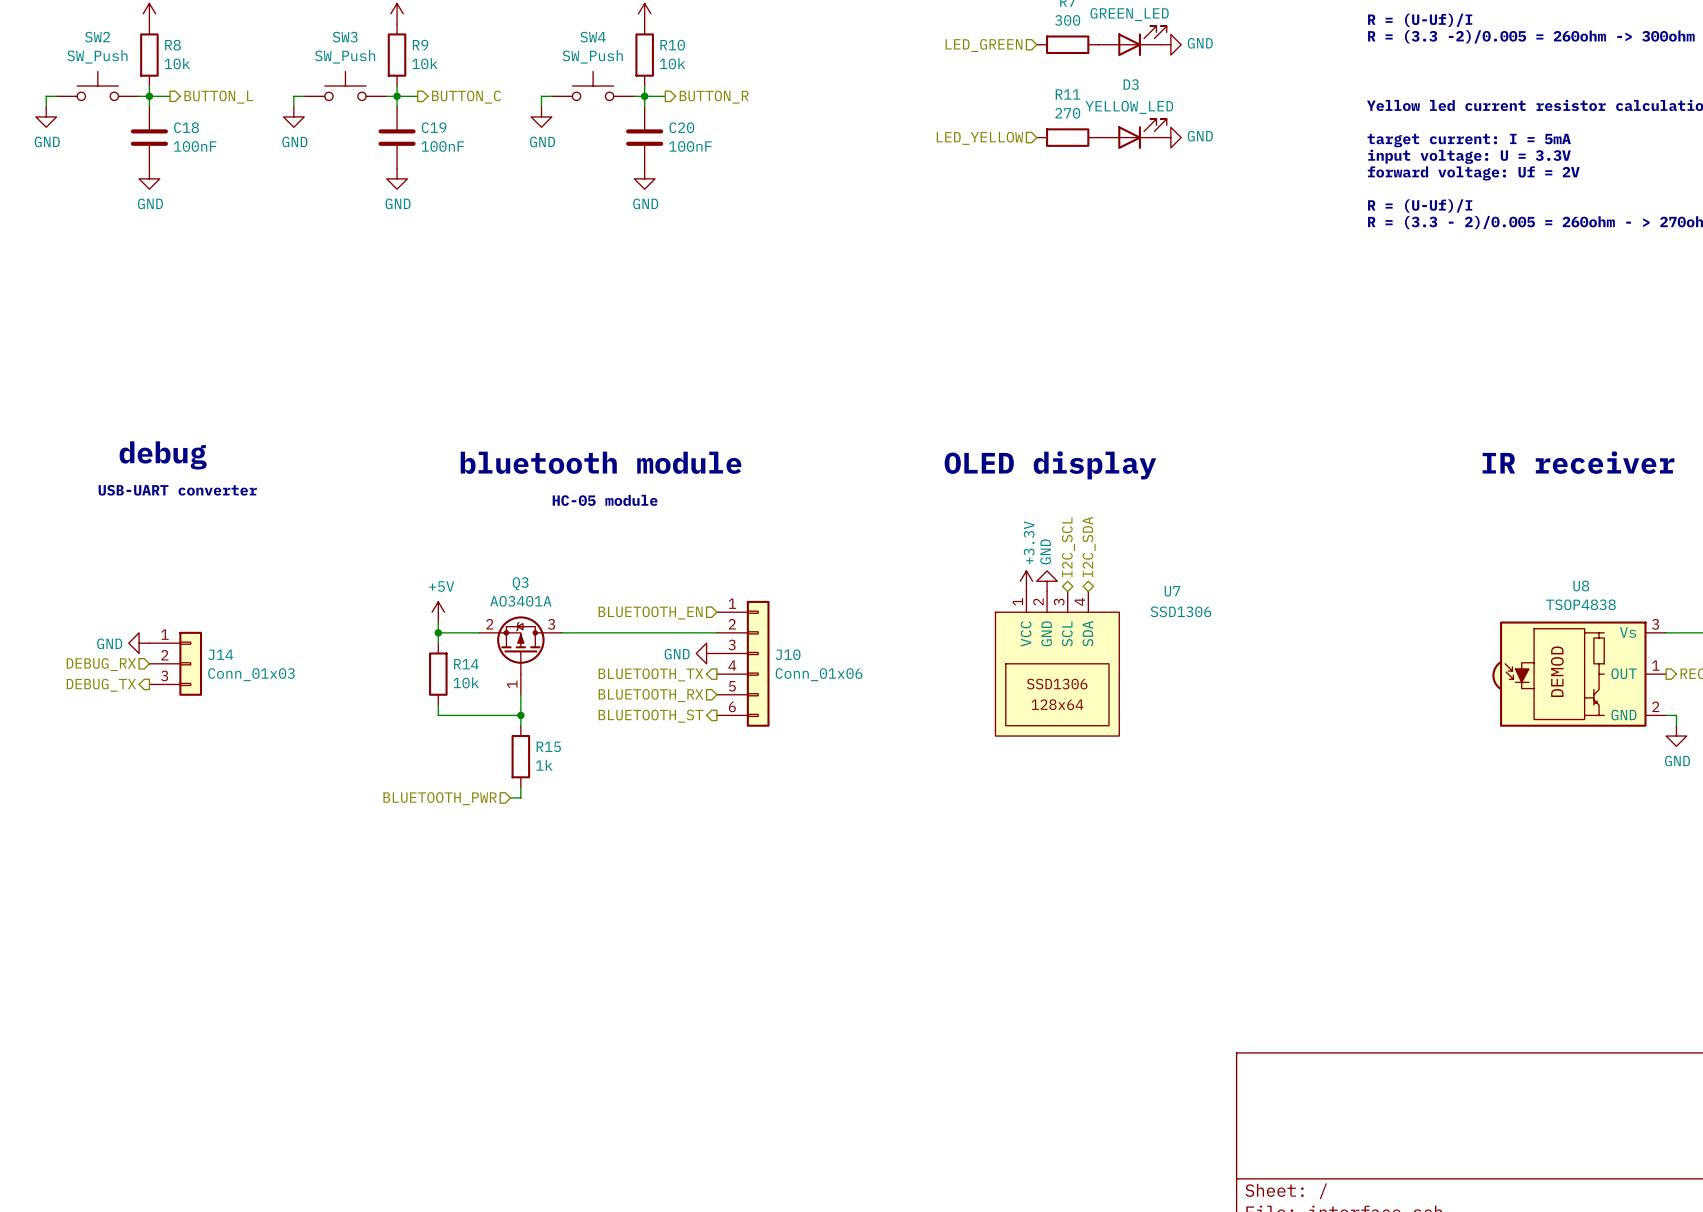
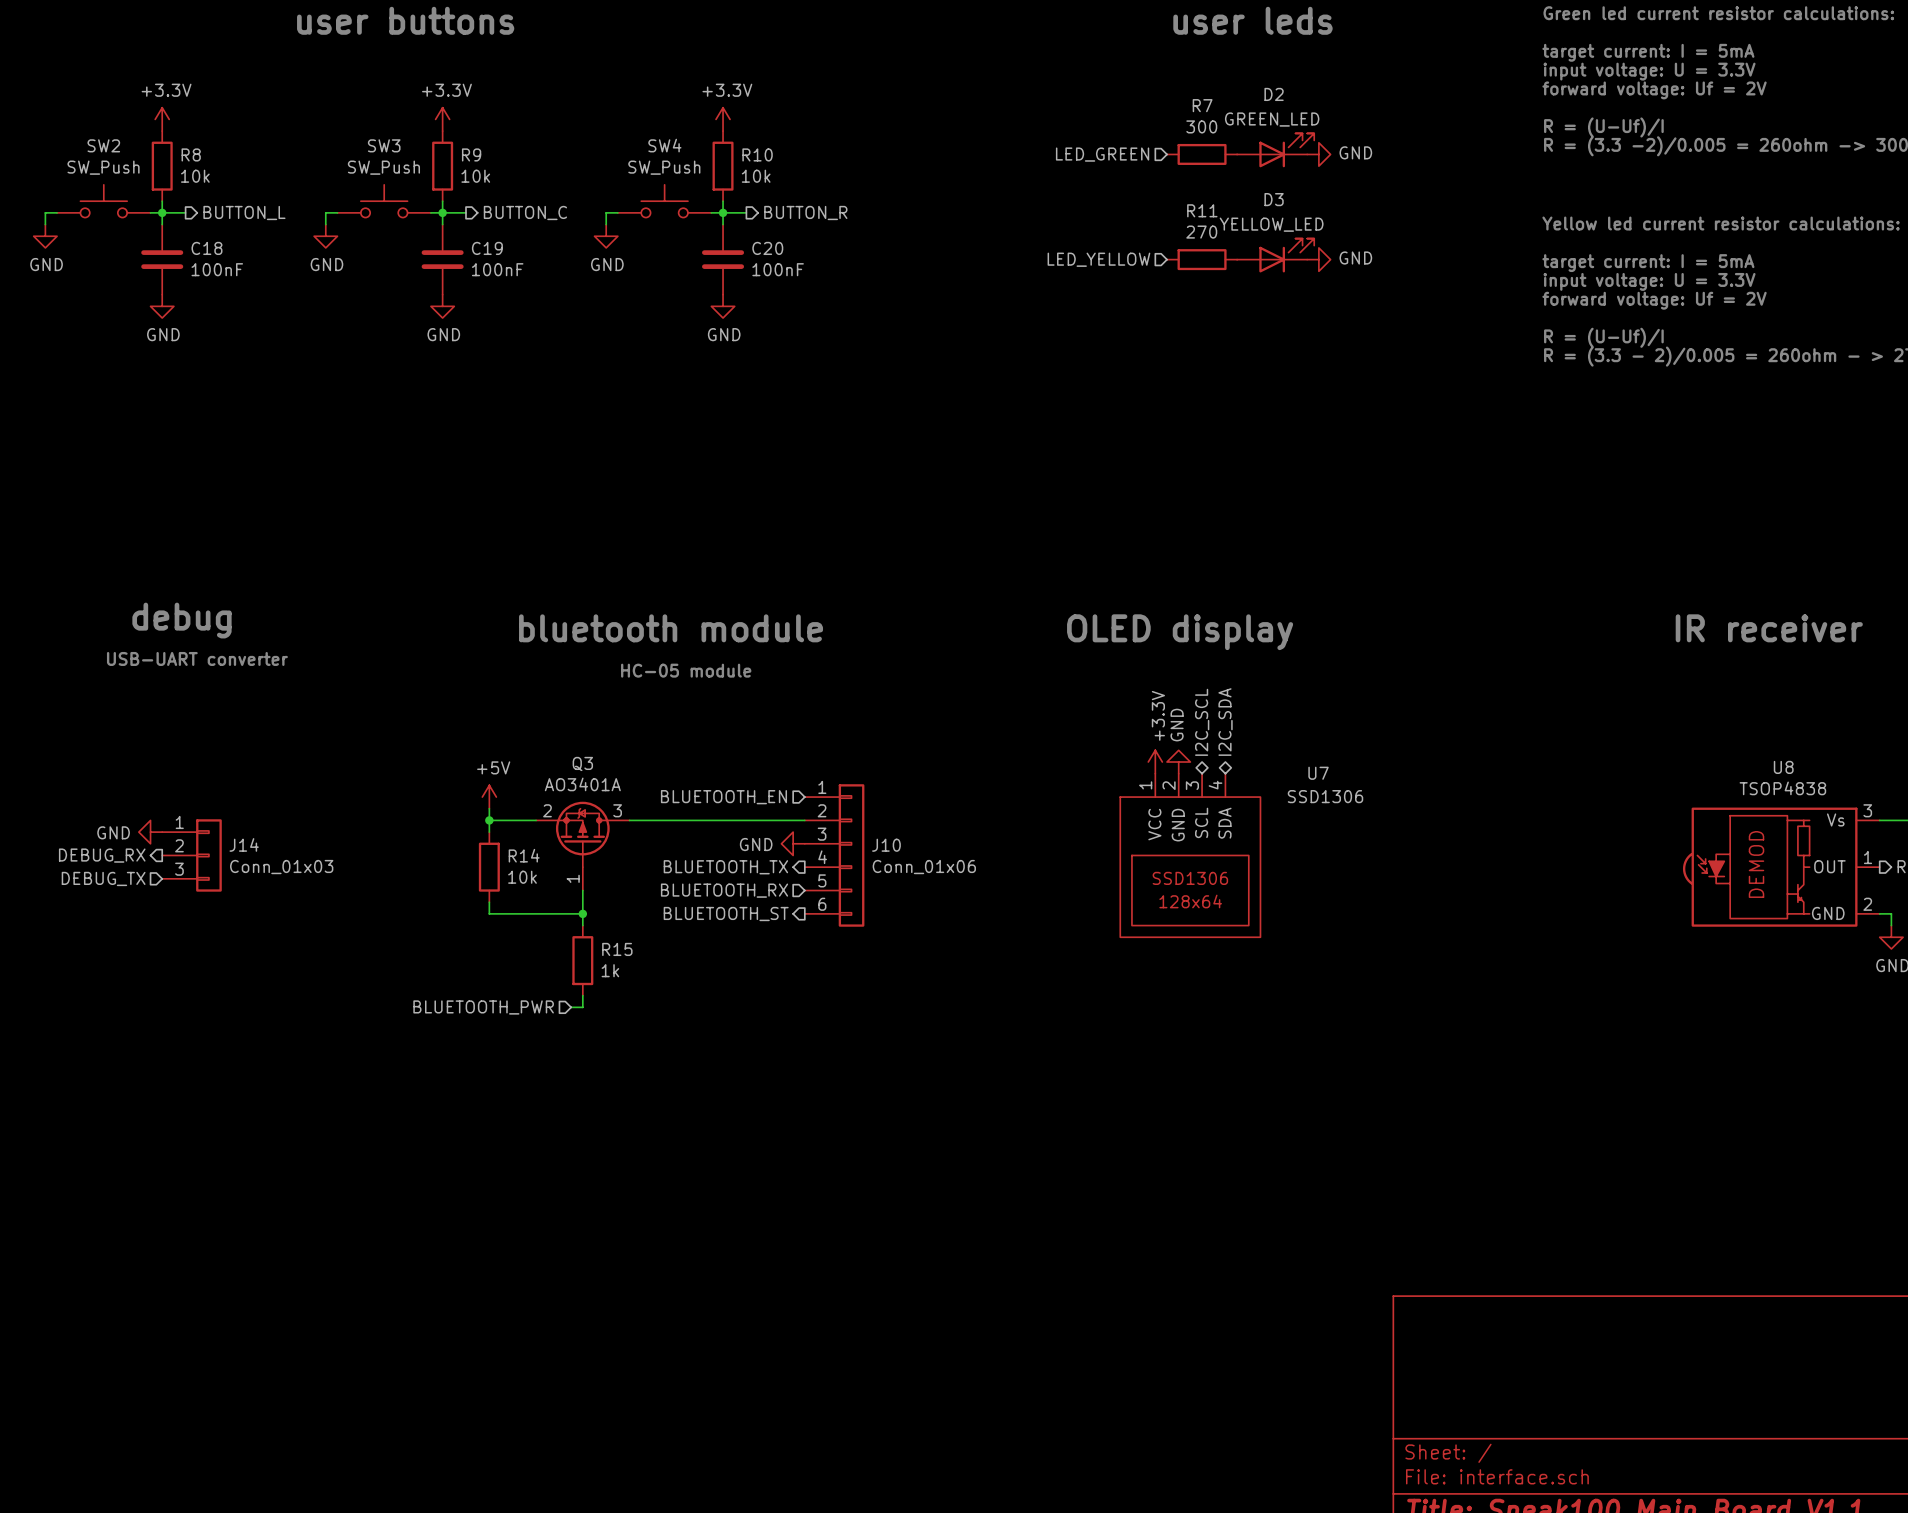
hierarchical label shape: input (101, 664) -> output (102, 855)
hierarchical label shape: output (101, 685) -> input (103, 878)

